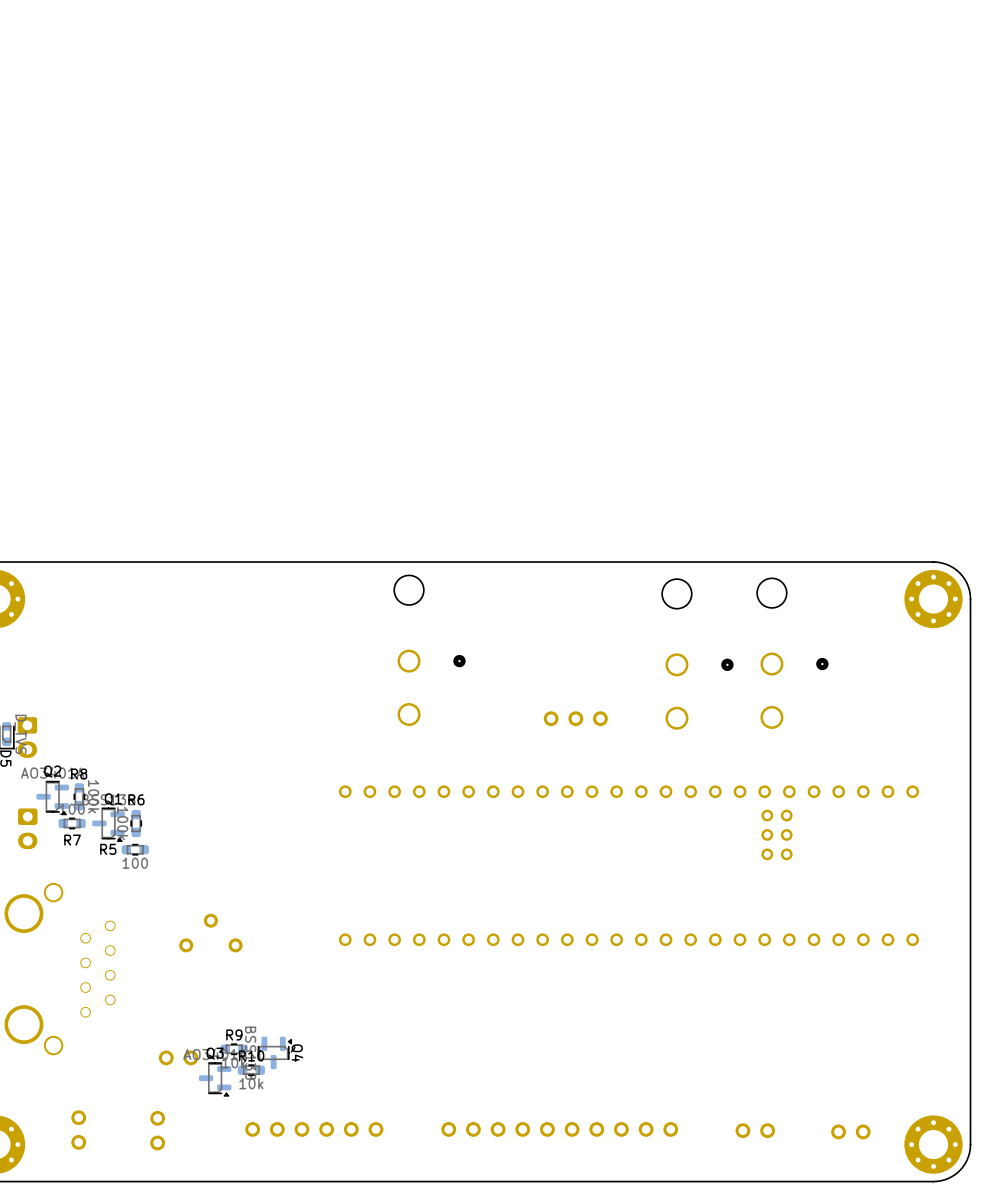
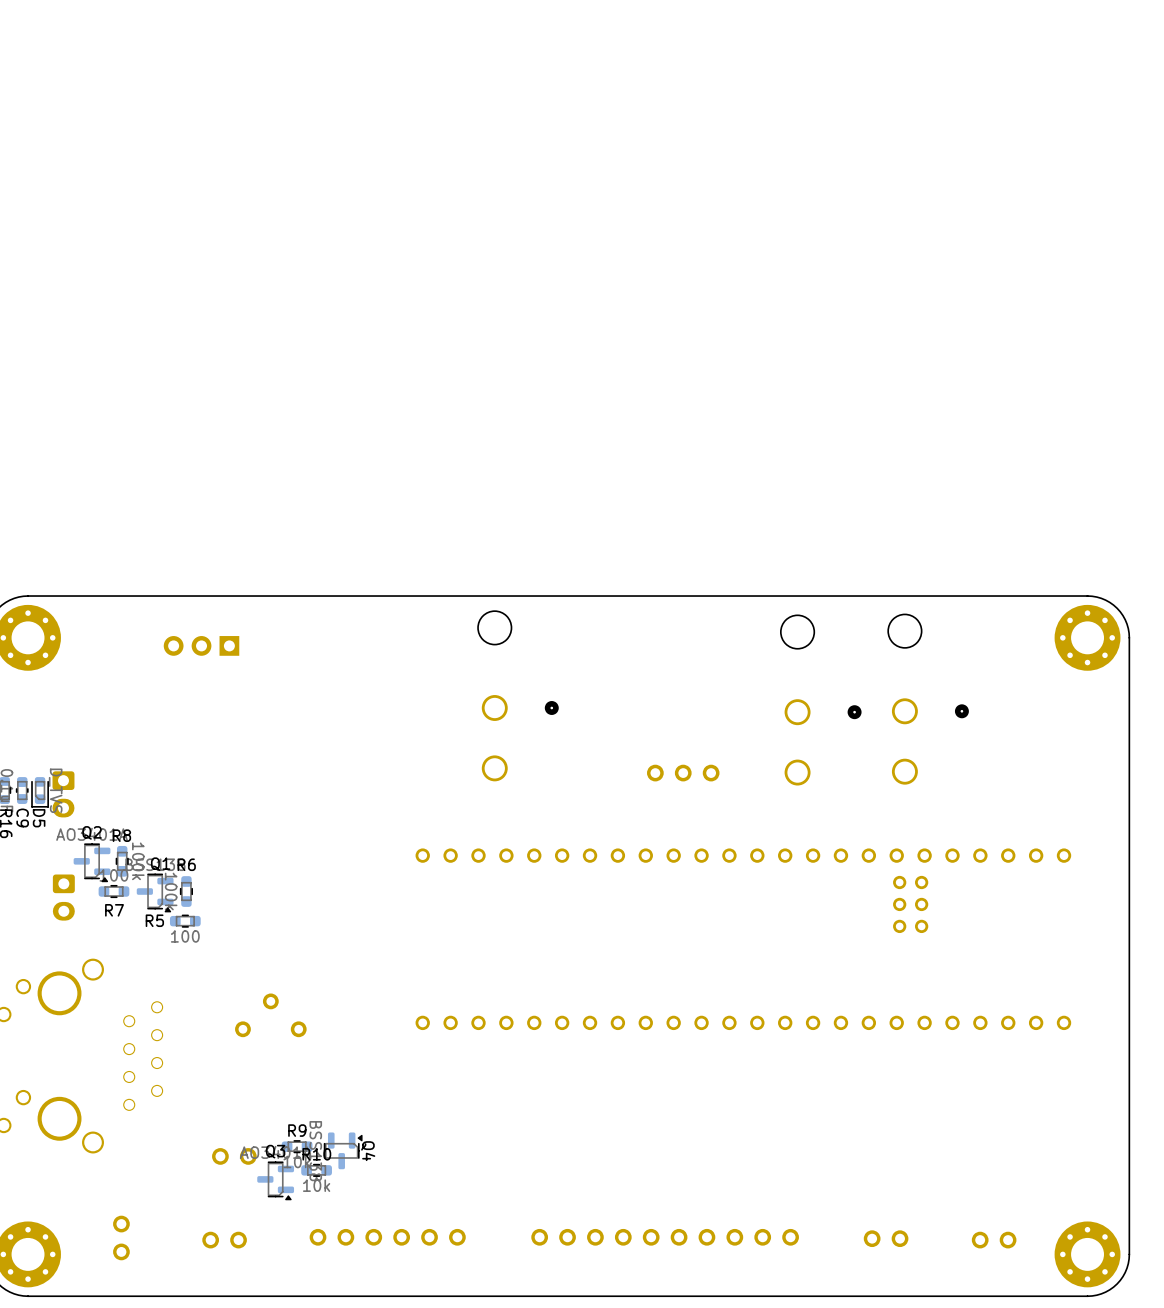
part: none -> (201, 645)
part rotation: 0° (157, 1130) -> 90° clockwise (224, 1240)

